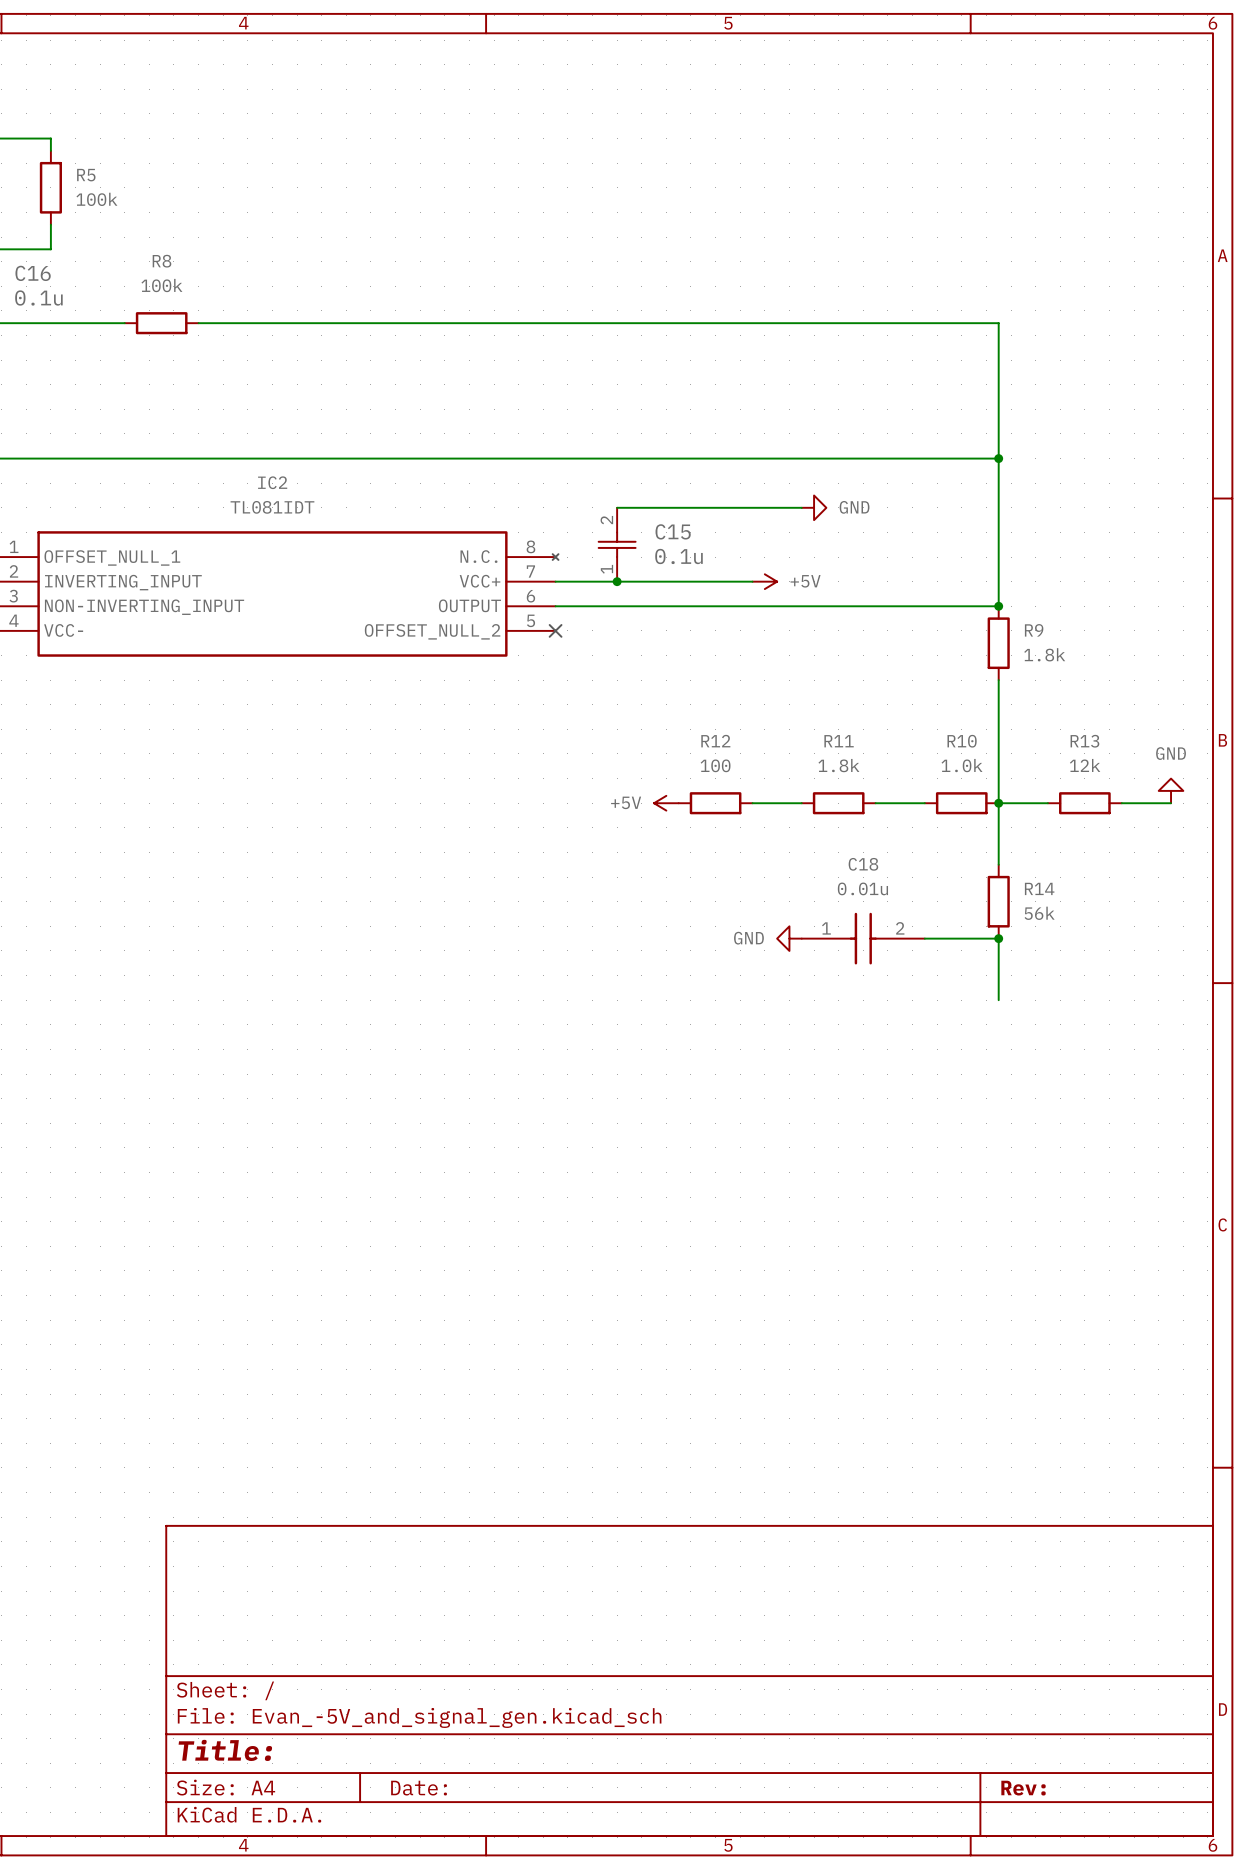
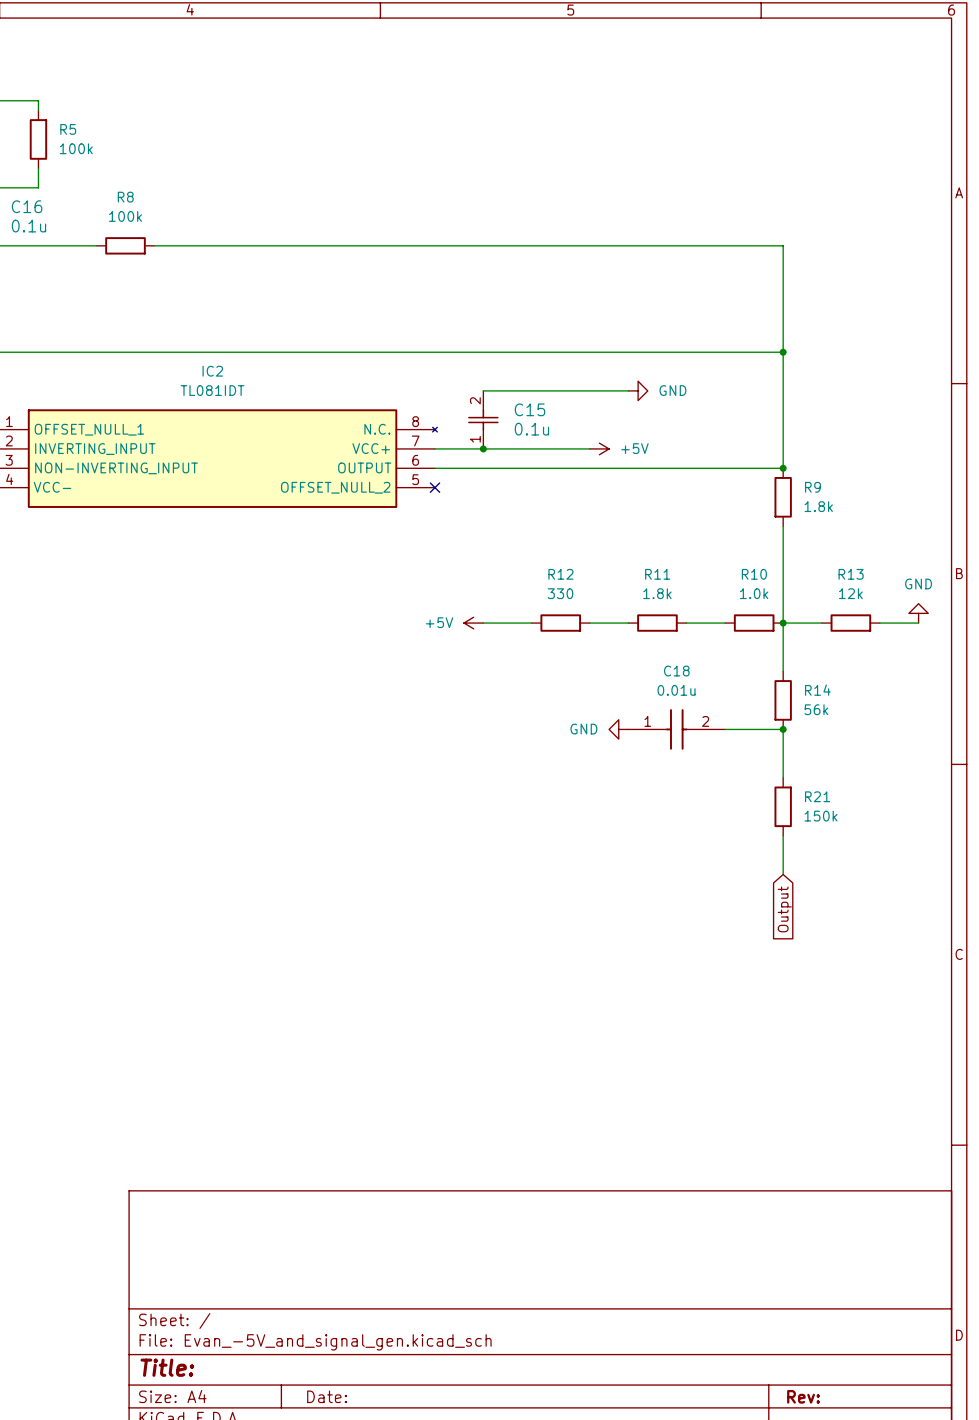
R12 value: 100 (715, 765) -> 330 (560, 593)
wire: none -> (483, 623) (531, 623)
power symbol position: +5V (666, 803) -> +5V (473, 623)
R21: none -> 150k (783, 806)
wire: none -> (783, 835) (783, 874)
global label: none -> Output (784, 909)

